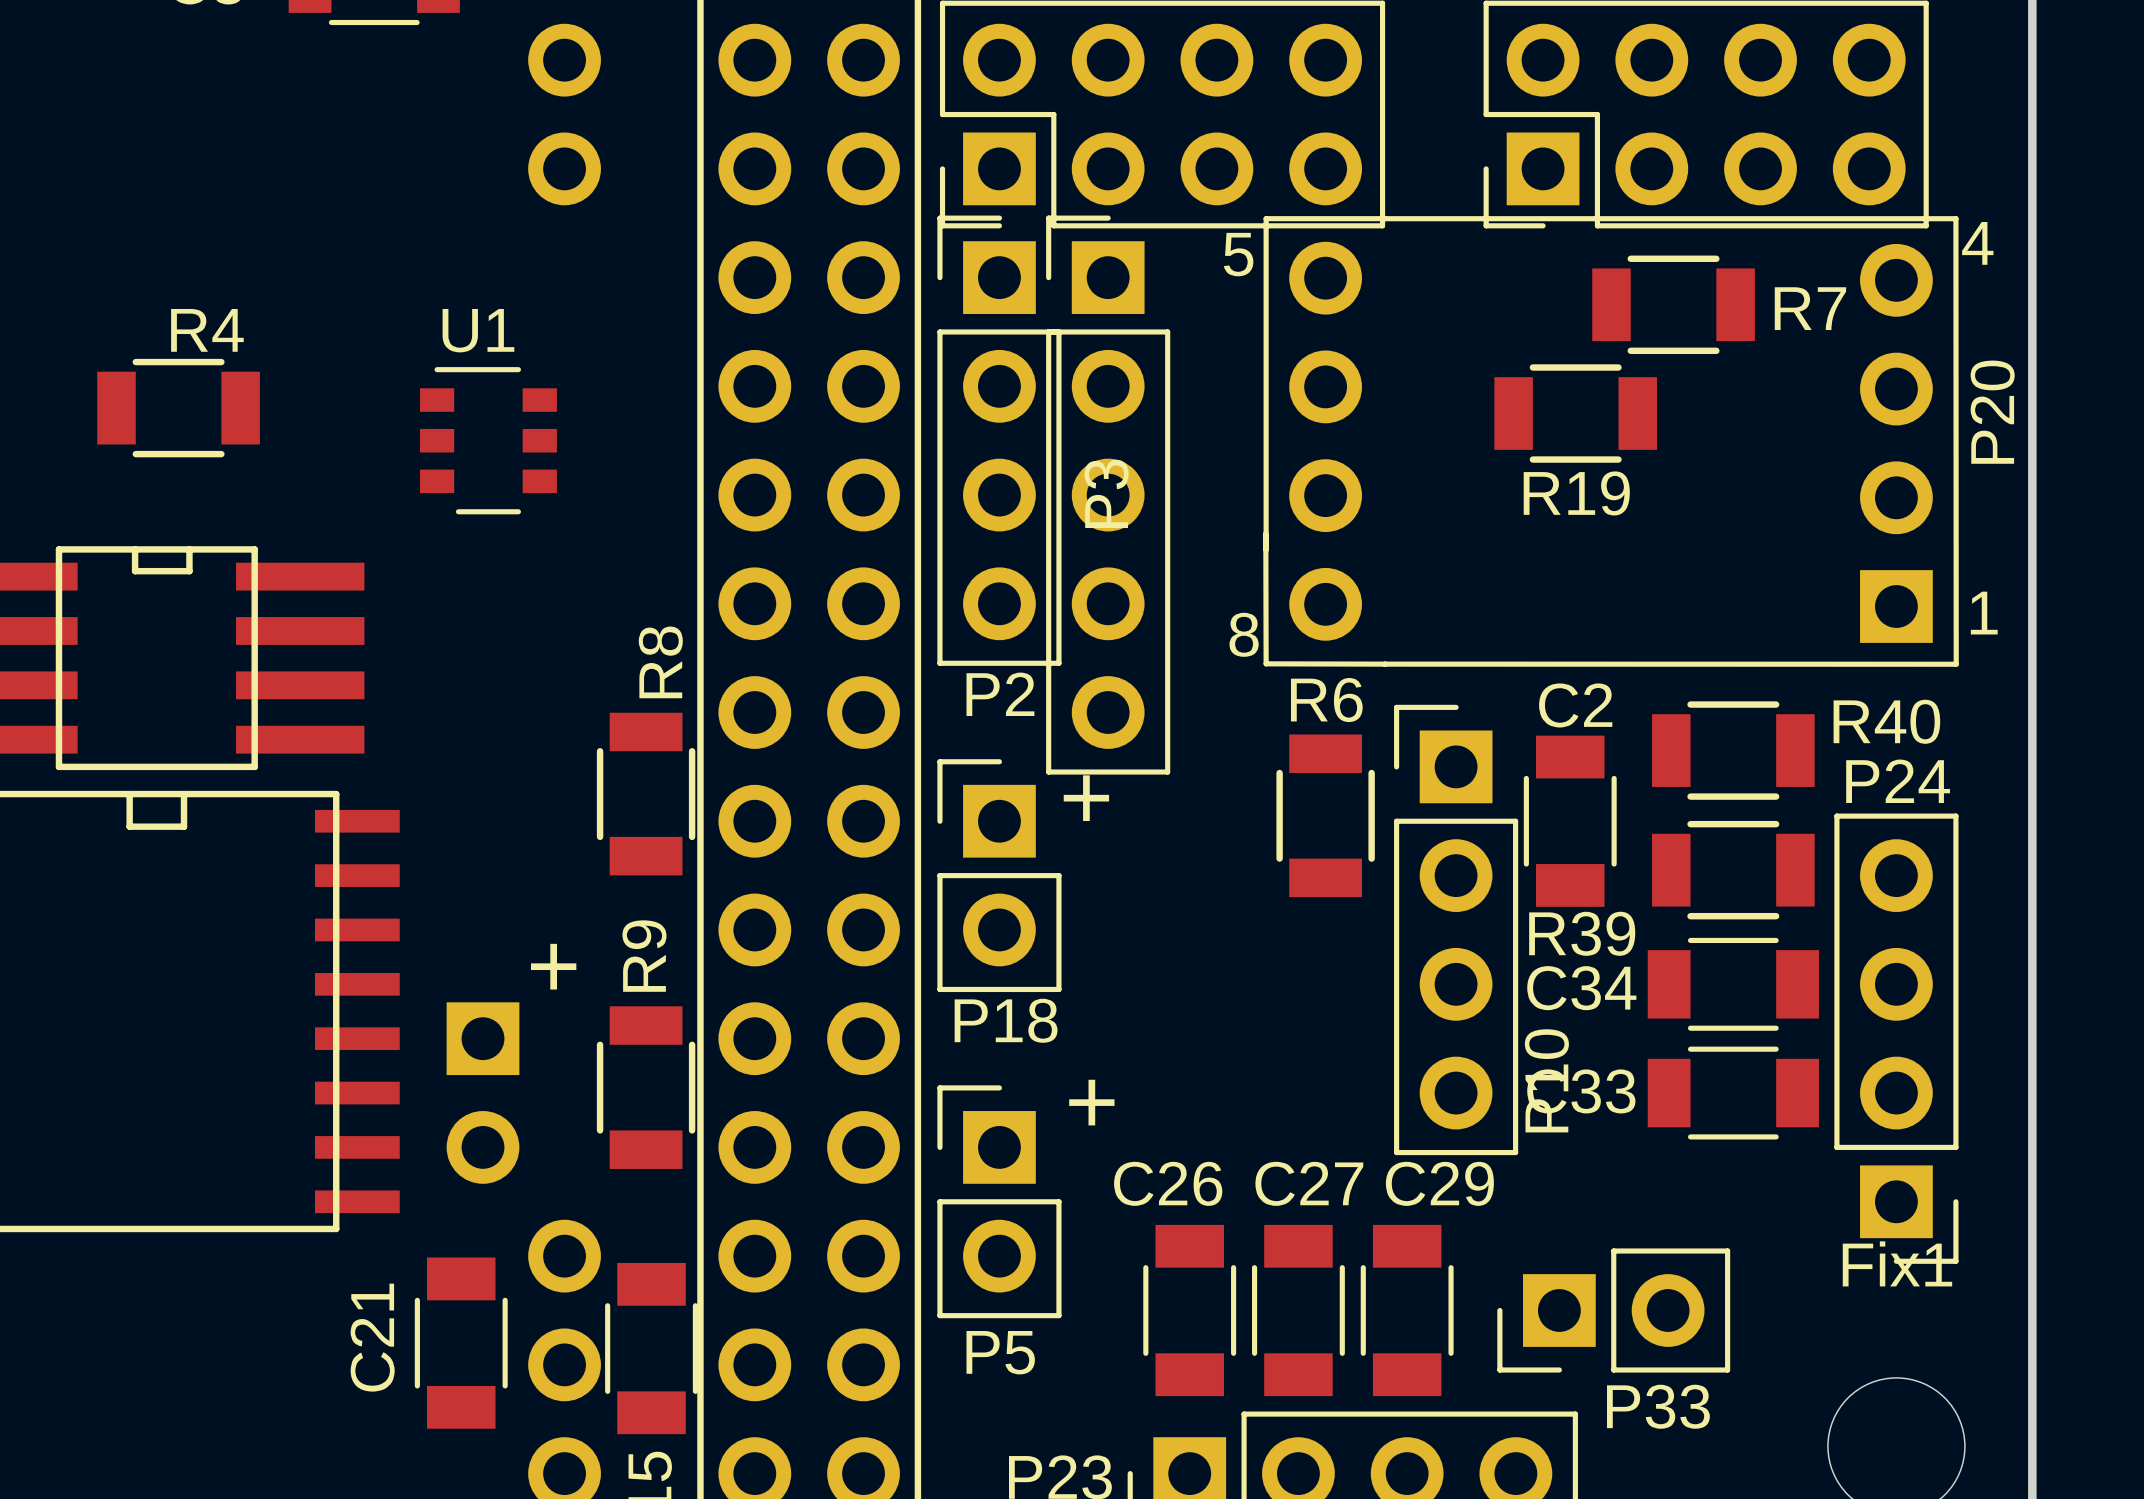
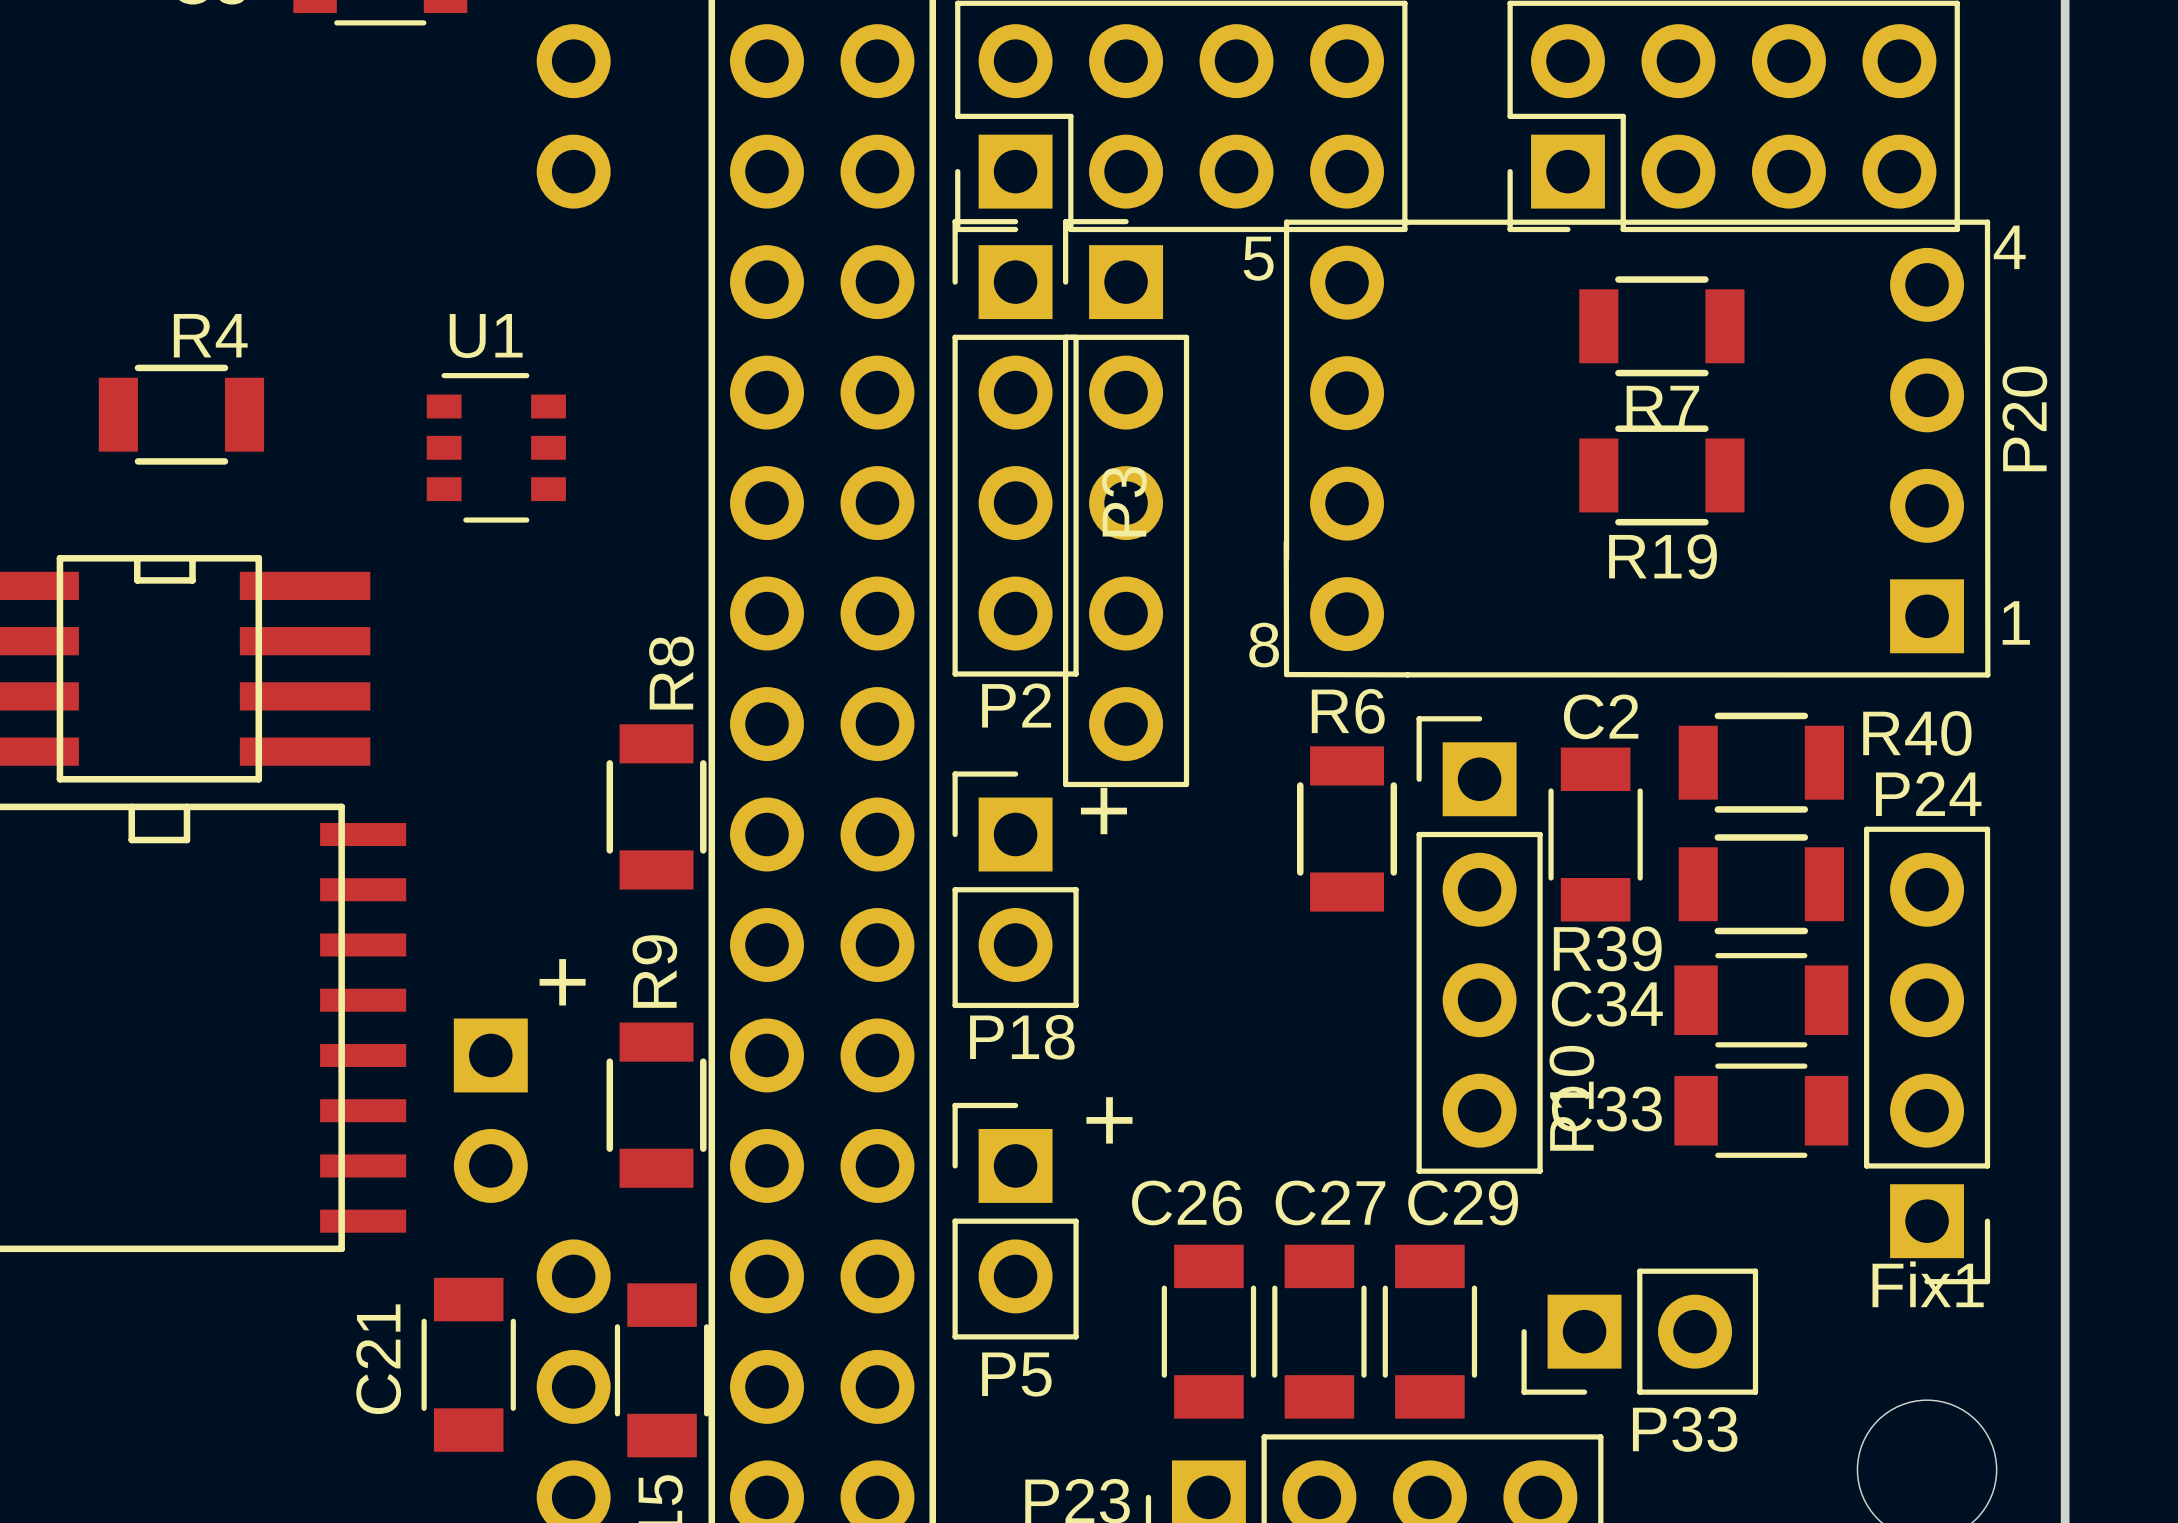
R7 position: (1673, 304) -> (1661, 326)
R7 name position: R7 (1810, 308) -> R7 (1662, 407)
R19 position: (1575, 413) -> (1661, 475)

